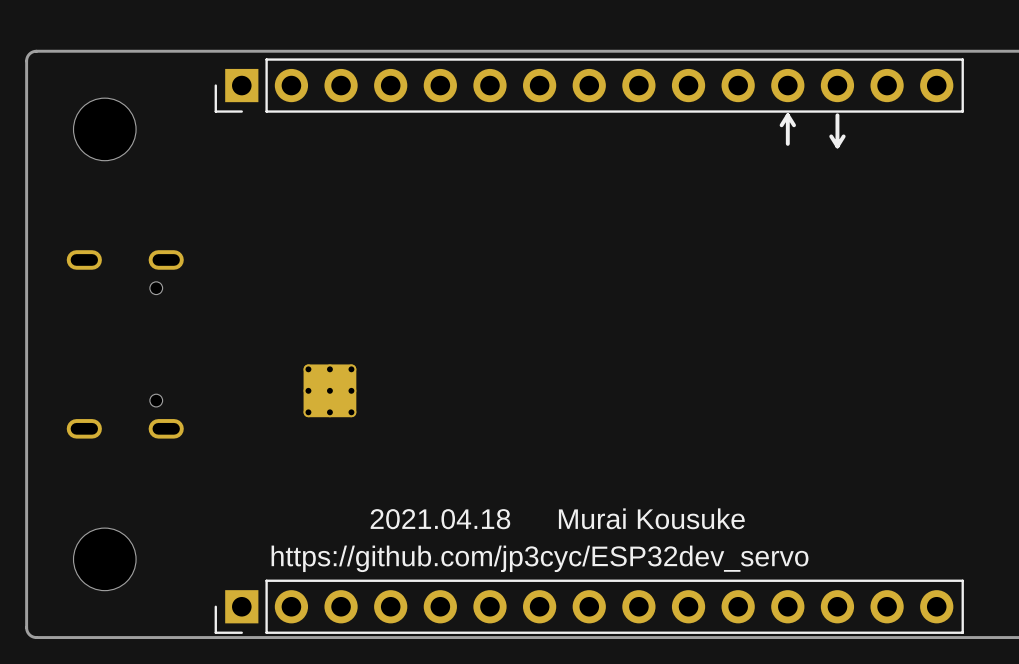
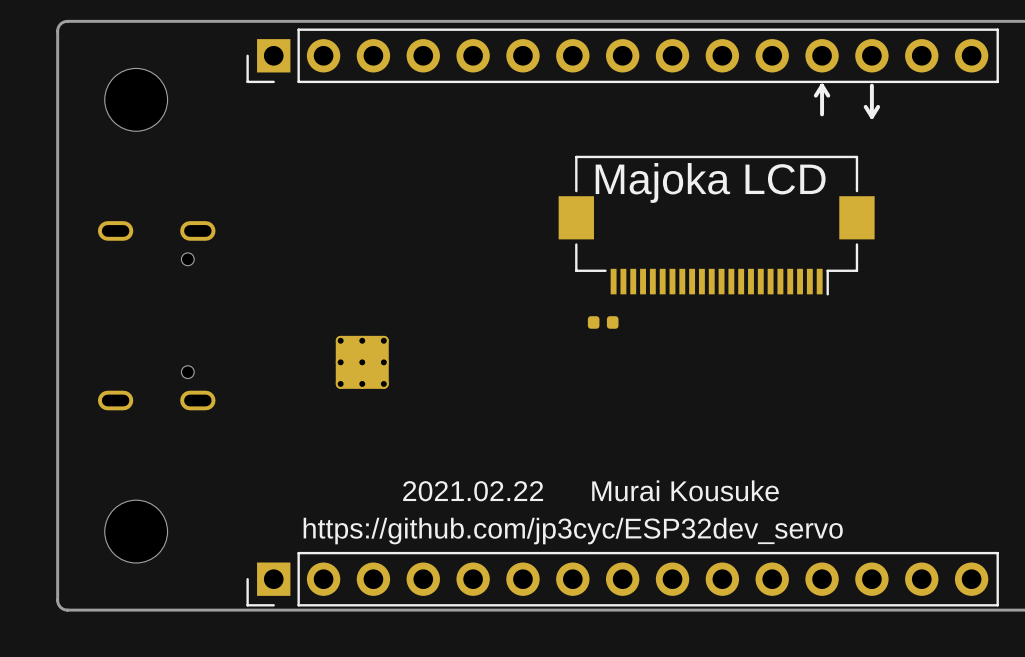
text: none -> Majoka LCD (710, 182)
part: none -> (716, 225)
part: none -> (603, 322)
text: 2021.04.18 (440, 519) -> 2021.02.22 (473, 491)

